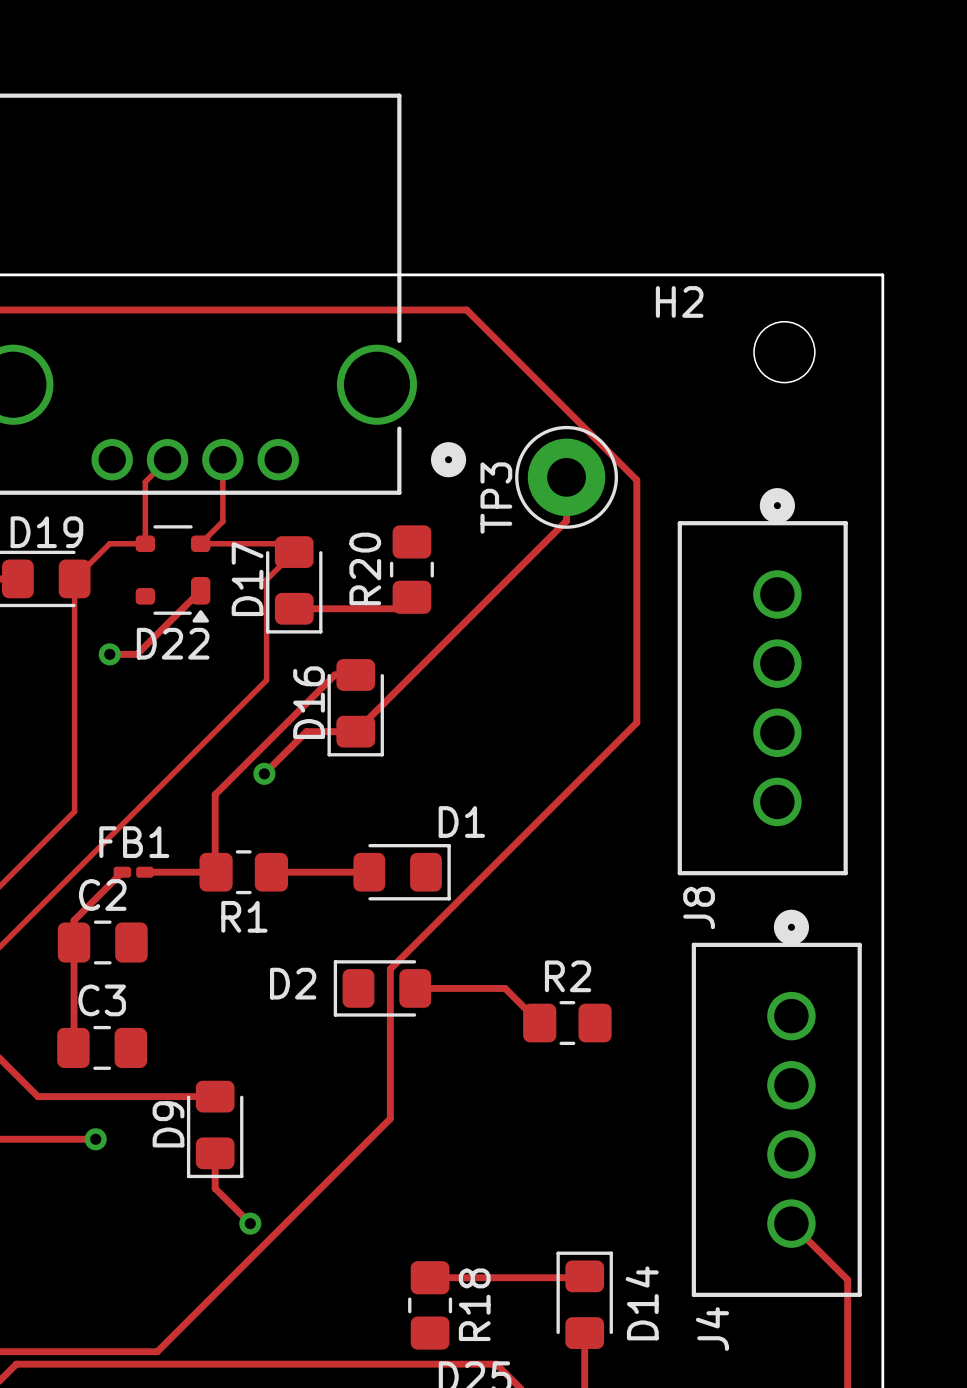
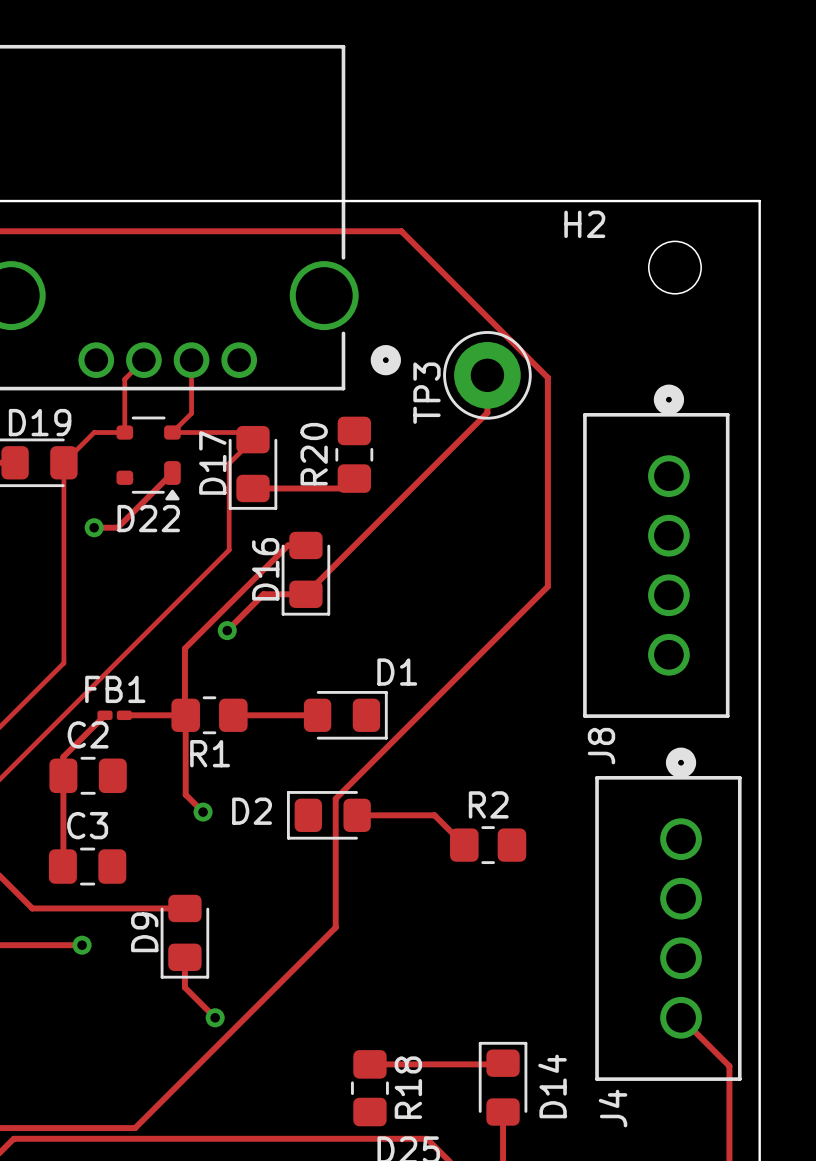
track: none -> (185, 715) (185, 794) (203, 812)
via: none -> (203, 812)

